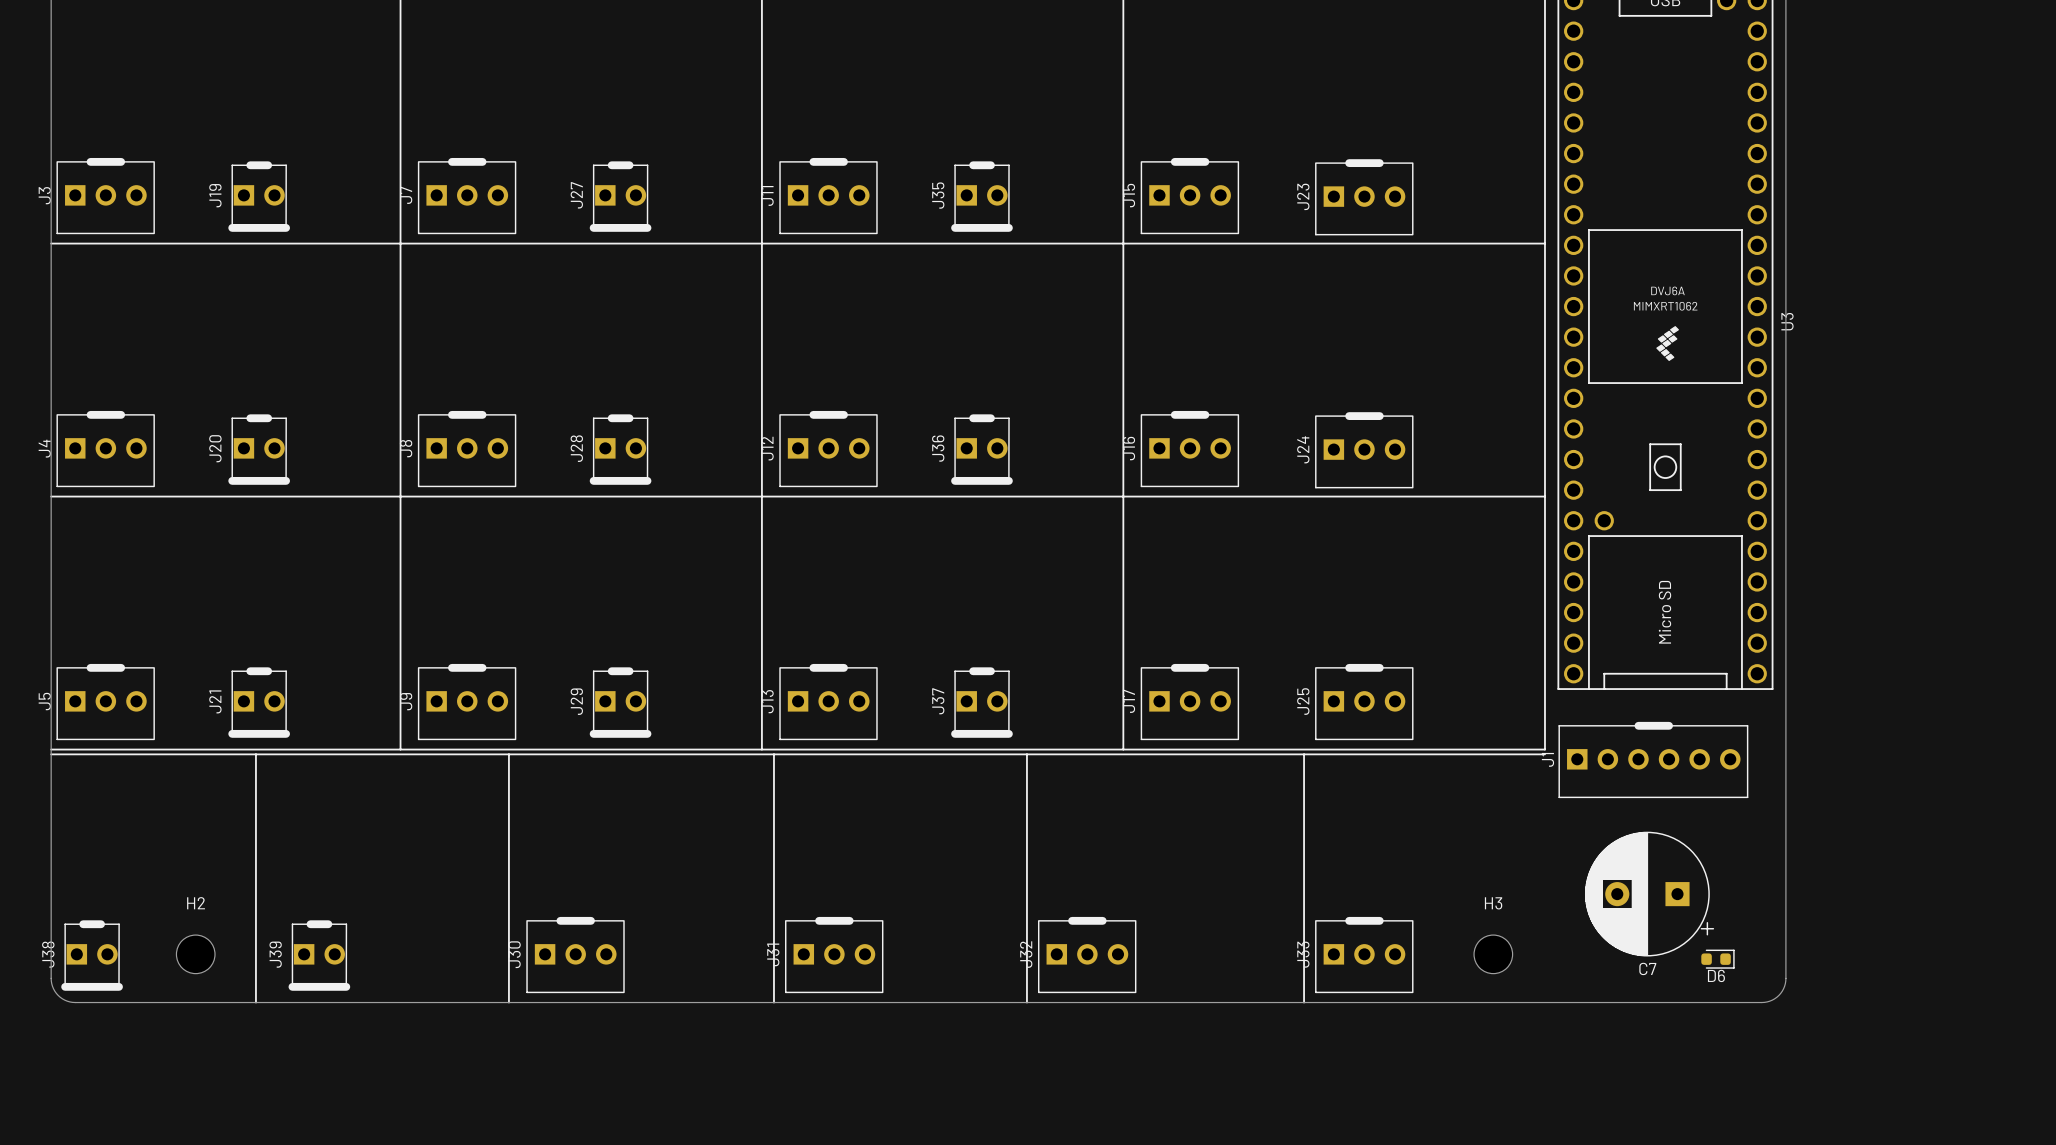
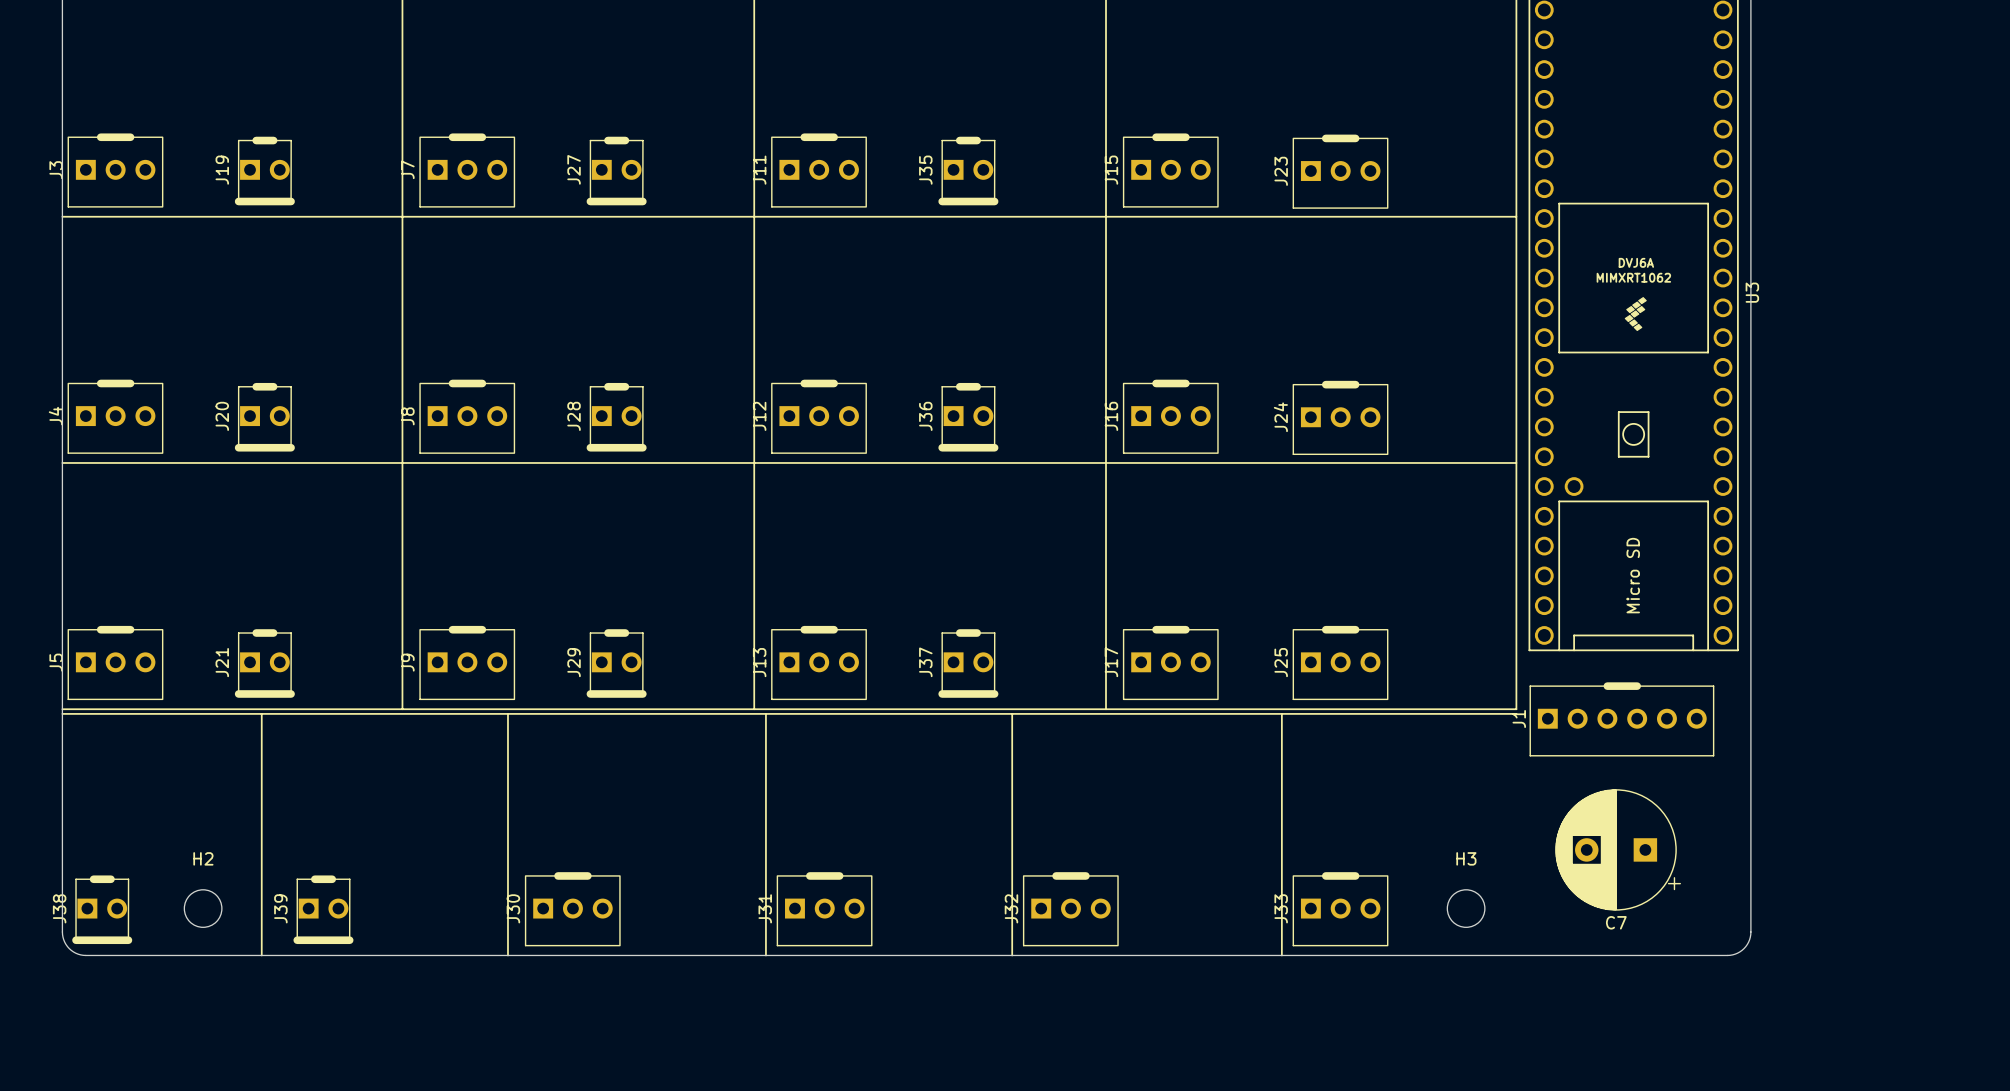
D6: (1717, 959) -> none

